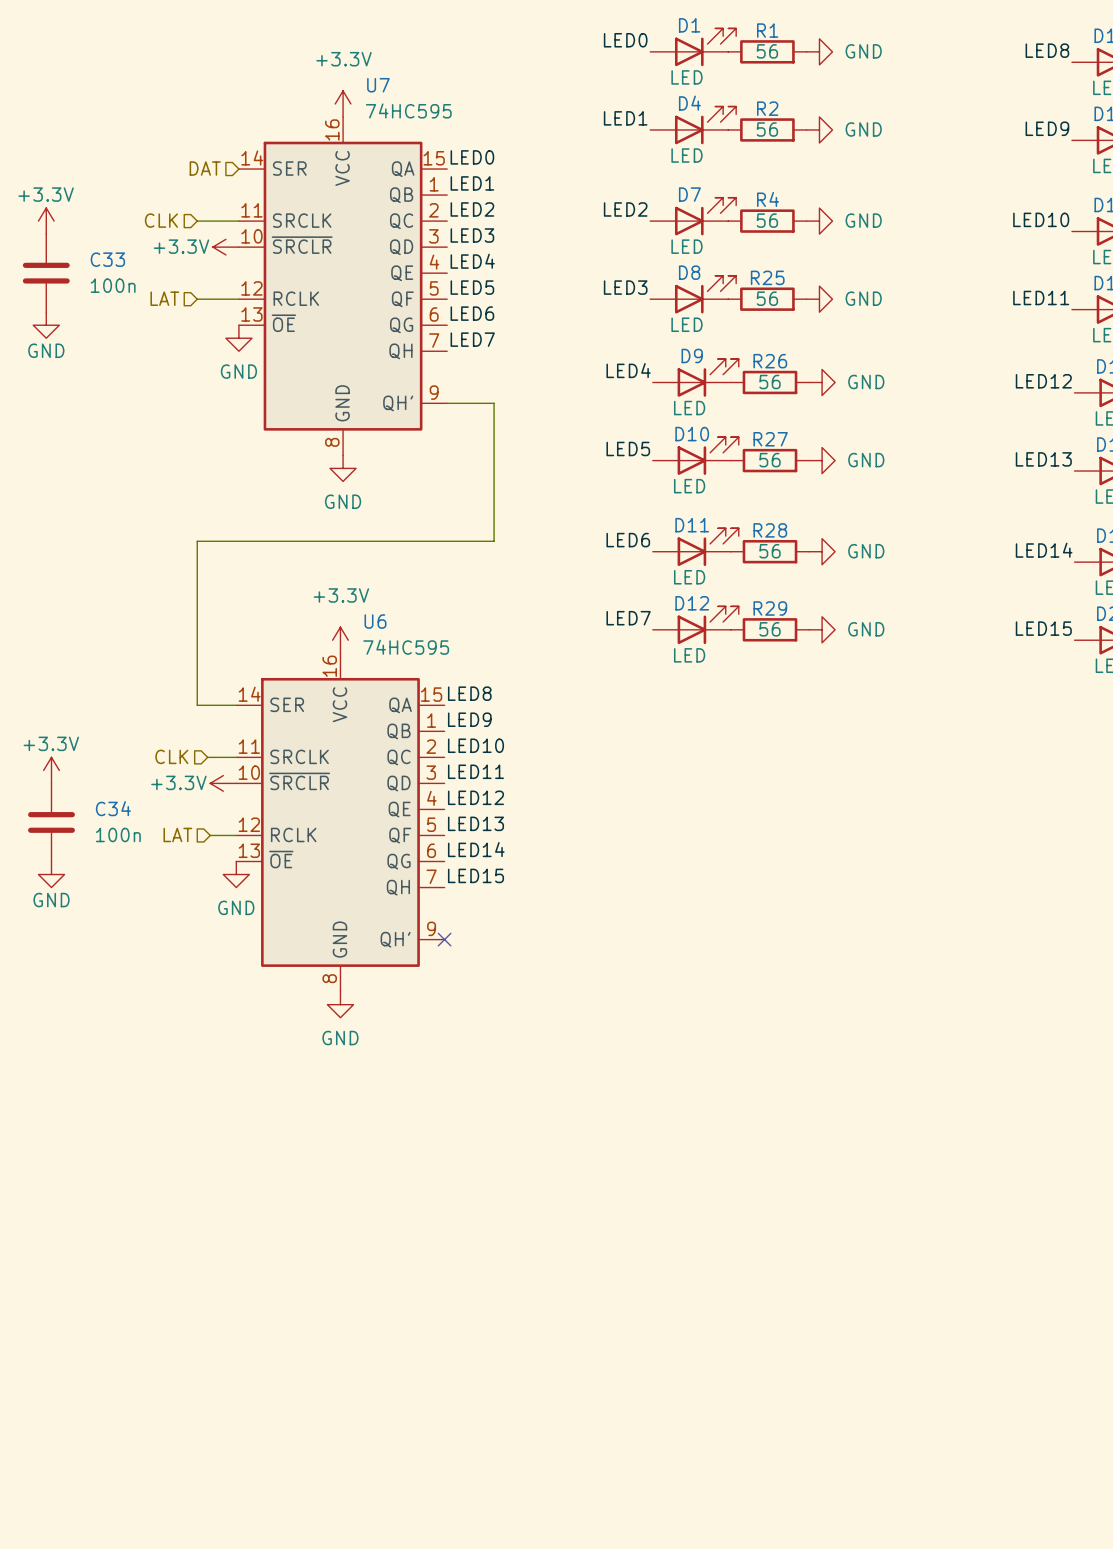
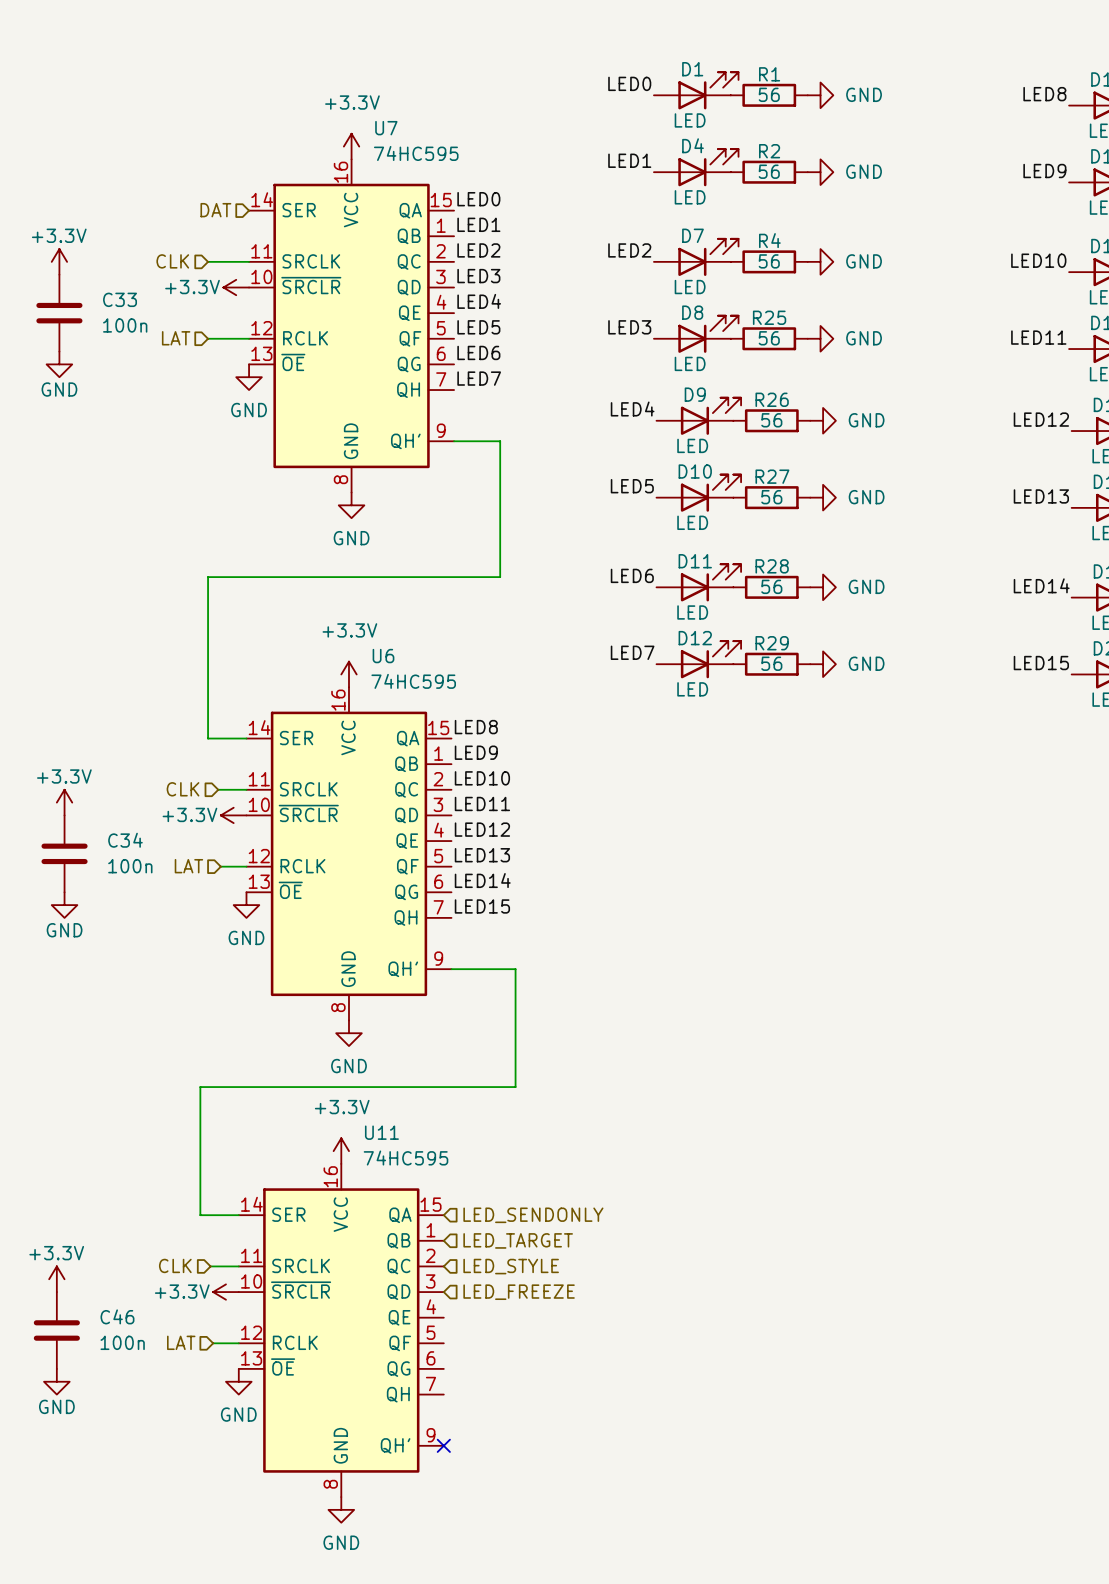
wire: none -> (451, 969) (515, 969) (515, 1087) (200, 1087) (200, 1215) (238, 1215)
no-connect mark: (444, 939) -> none
power symbol: none -> +3.3V (341, 1151)
hierarchical label: none -> LED_SENDONLY (533, 1215)
hierarchical label: none -> LED_TARGET (518, 1240)
hierarchical label: none -> CLK (175, 1265)
wire: none -> (210, 1266) (238, 1266)
hierarchical label: none -> LED_STYLE (511, 1266)
power symbol: none -> +3.3V (56, 1279)
power symbol: none -> +3.3V (225, 1292)
hierarchical label: none -> LED_FREEZE (519, 1292)
C46: none -> 100n (56, 1330)
U11: none -> 74HC595 (341, 1330)
hierarchical label: none -> LAT (181, 1342)
wire: none -> (213, 1343) (238, 1343)
power symbol: none -> GND (56, 1381)
power symbol: none -> GND (238, 1381)
no-connect mark: none -> (443, 1445)
power symbol: none -> GND (341, 1509)

